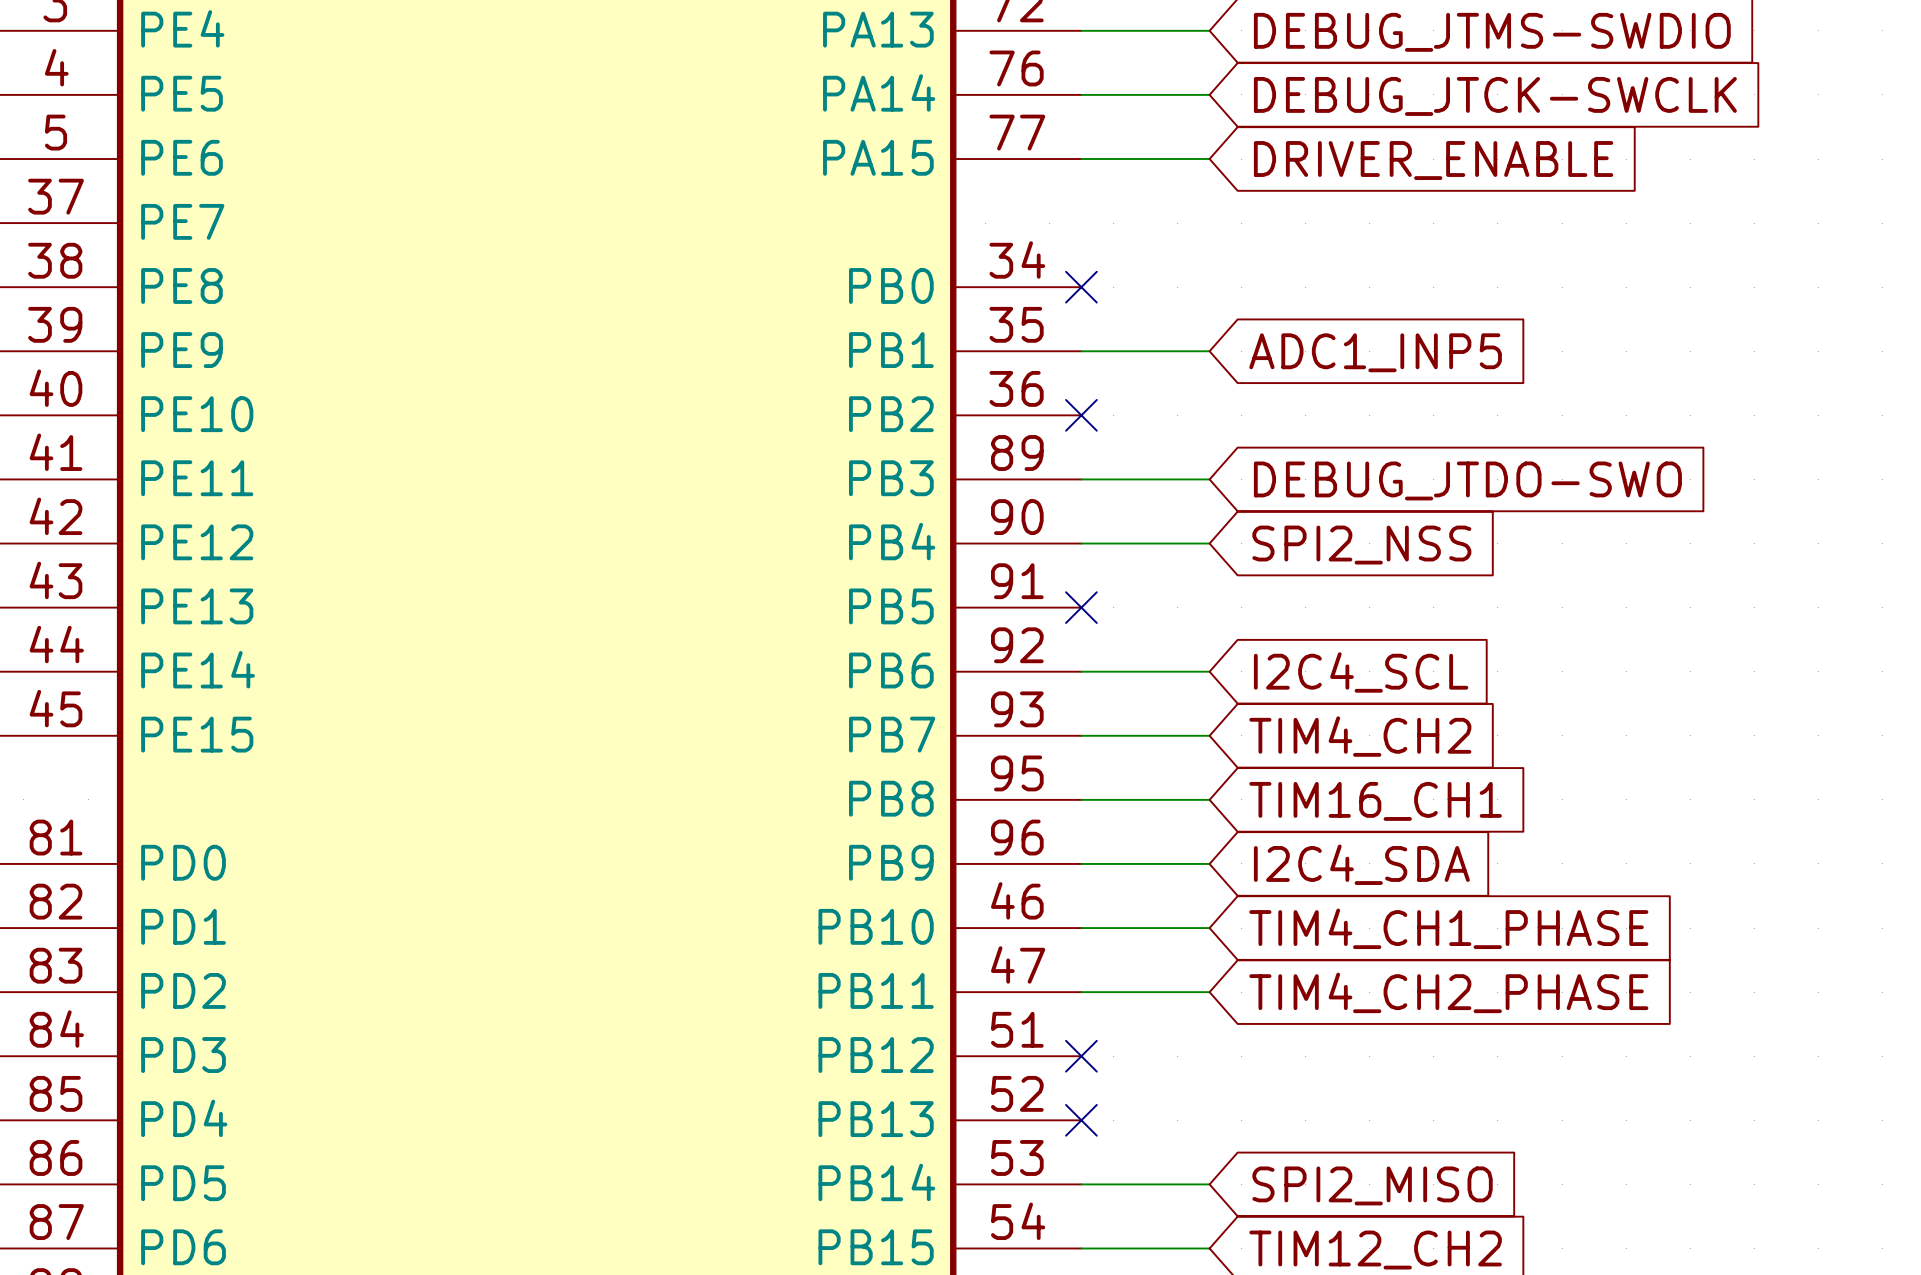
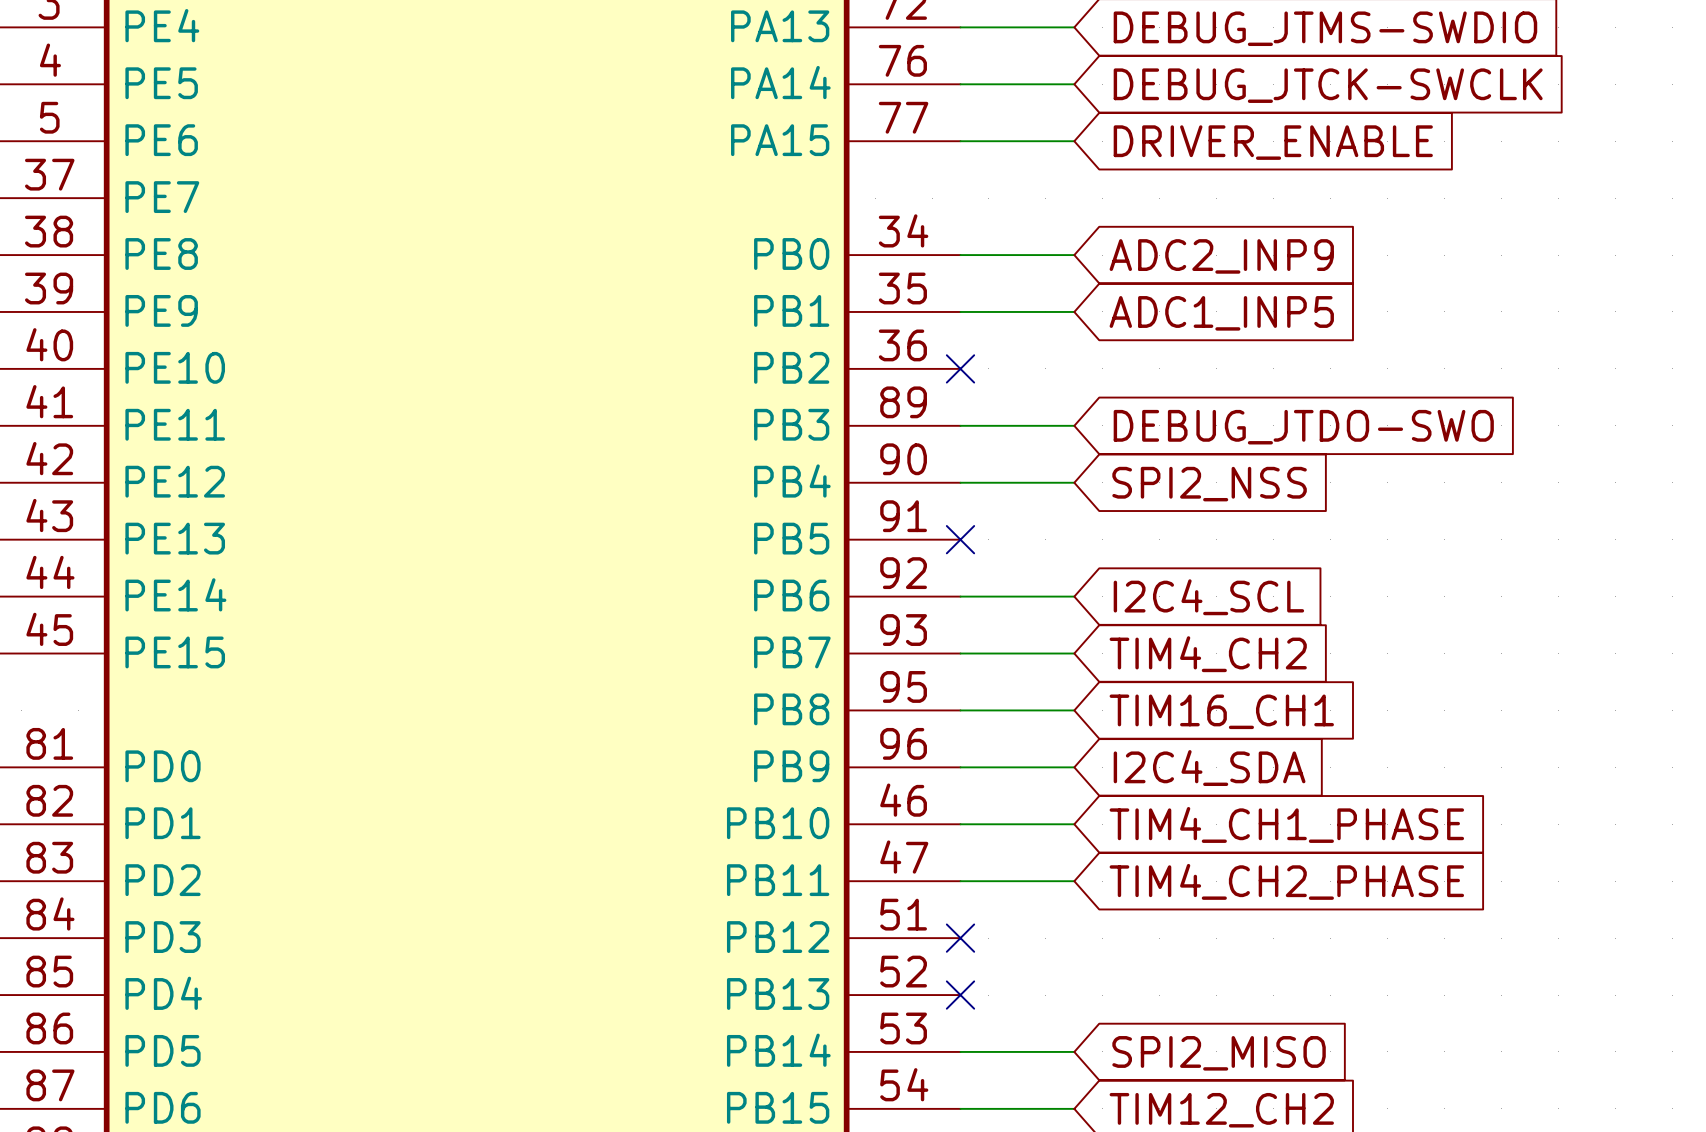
wire: none -> (960, 255) (1074, 255)
no-connect mark: (1081, 287) -> none
global label: none -> ADC2_INP9 (1221, 256)

